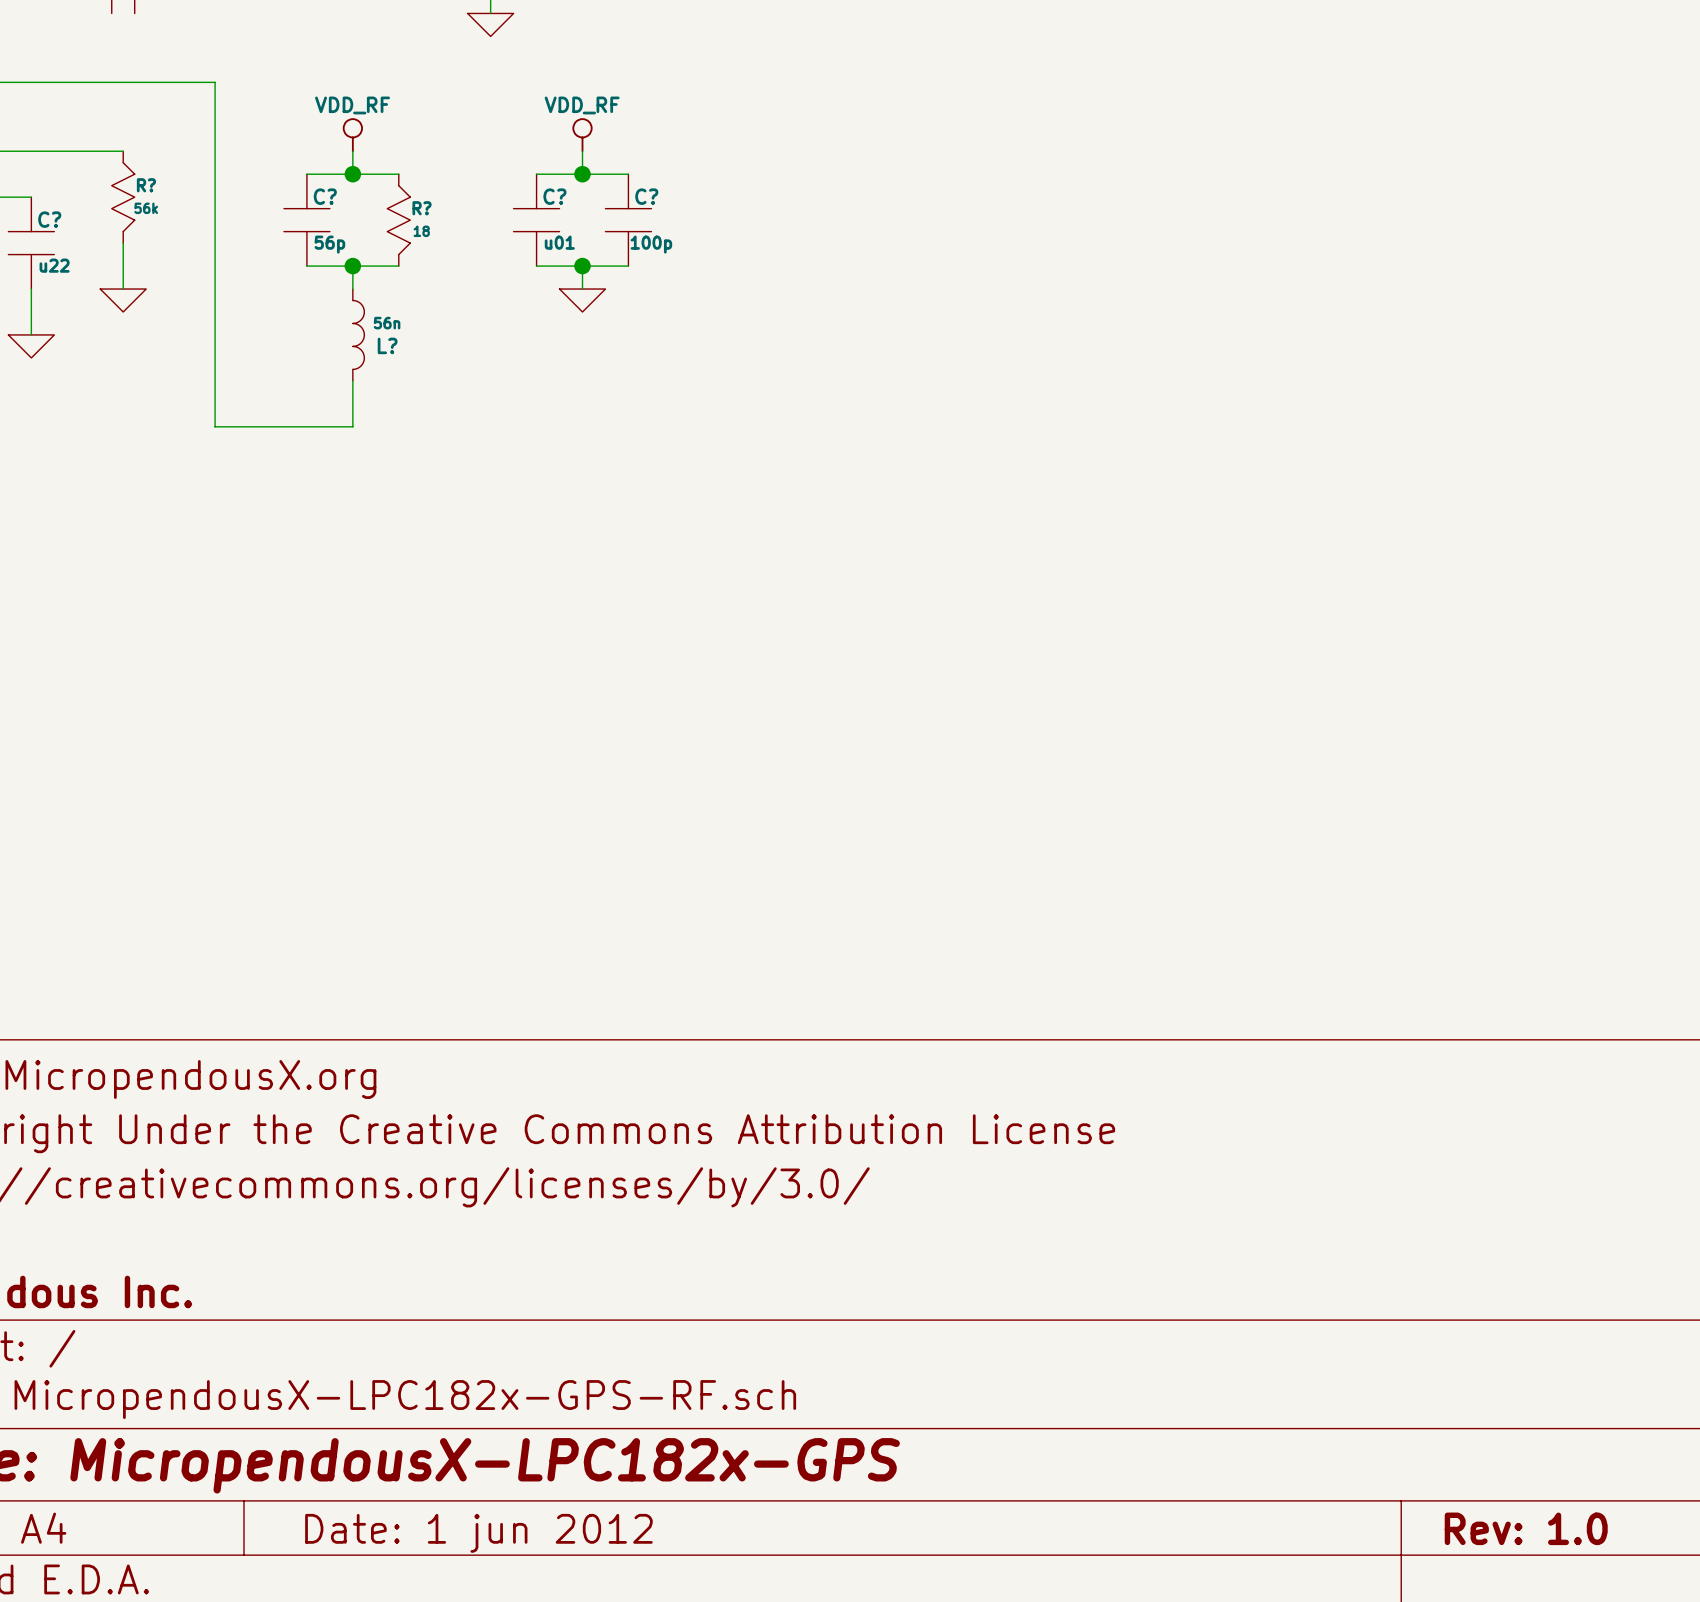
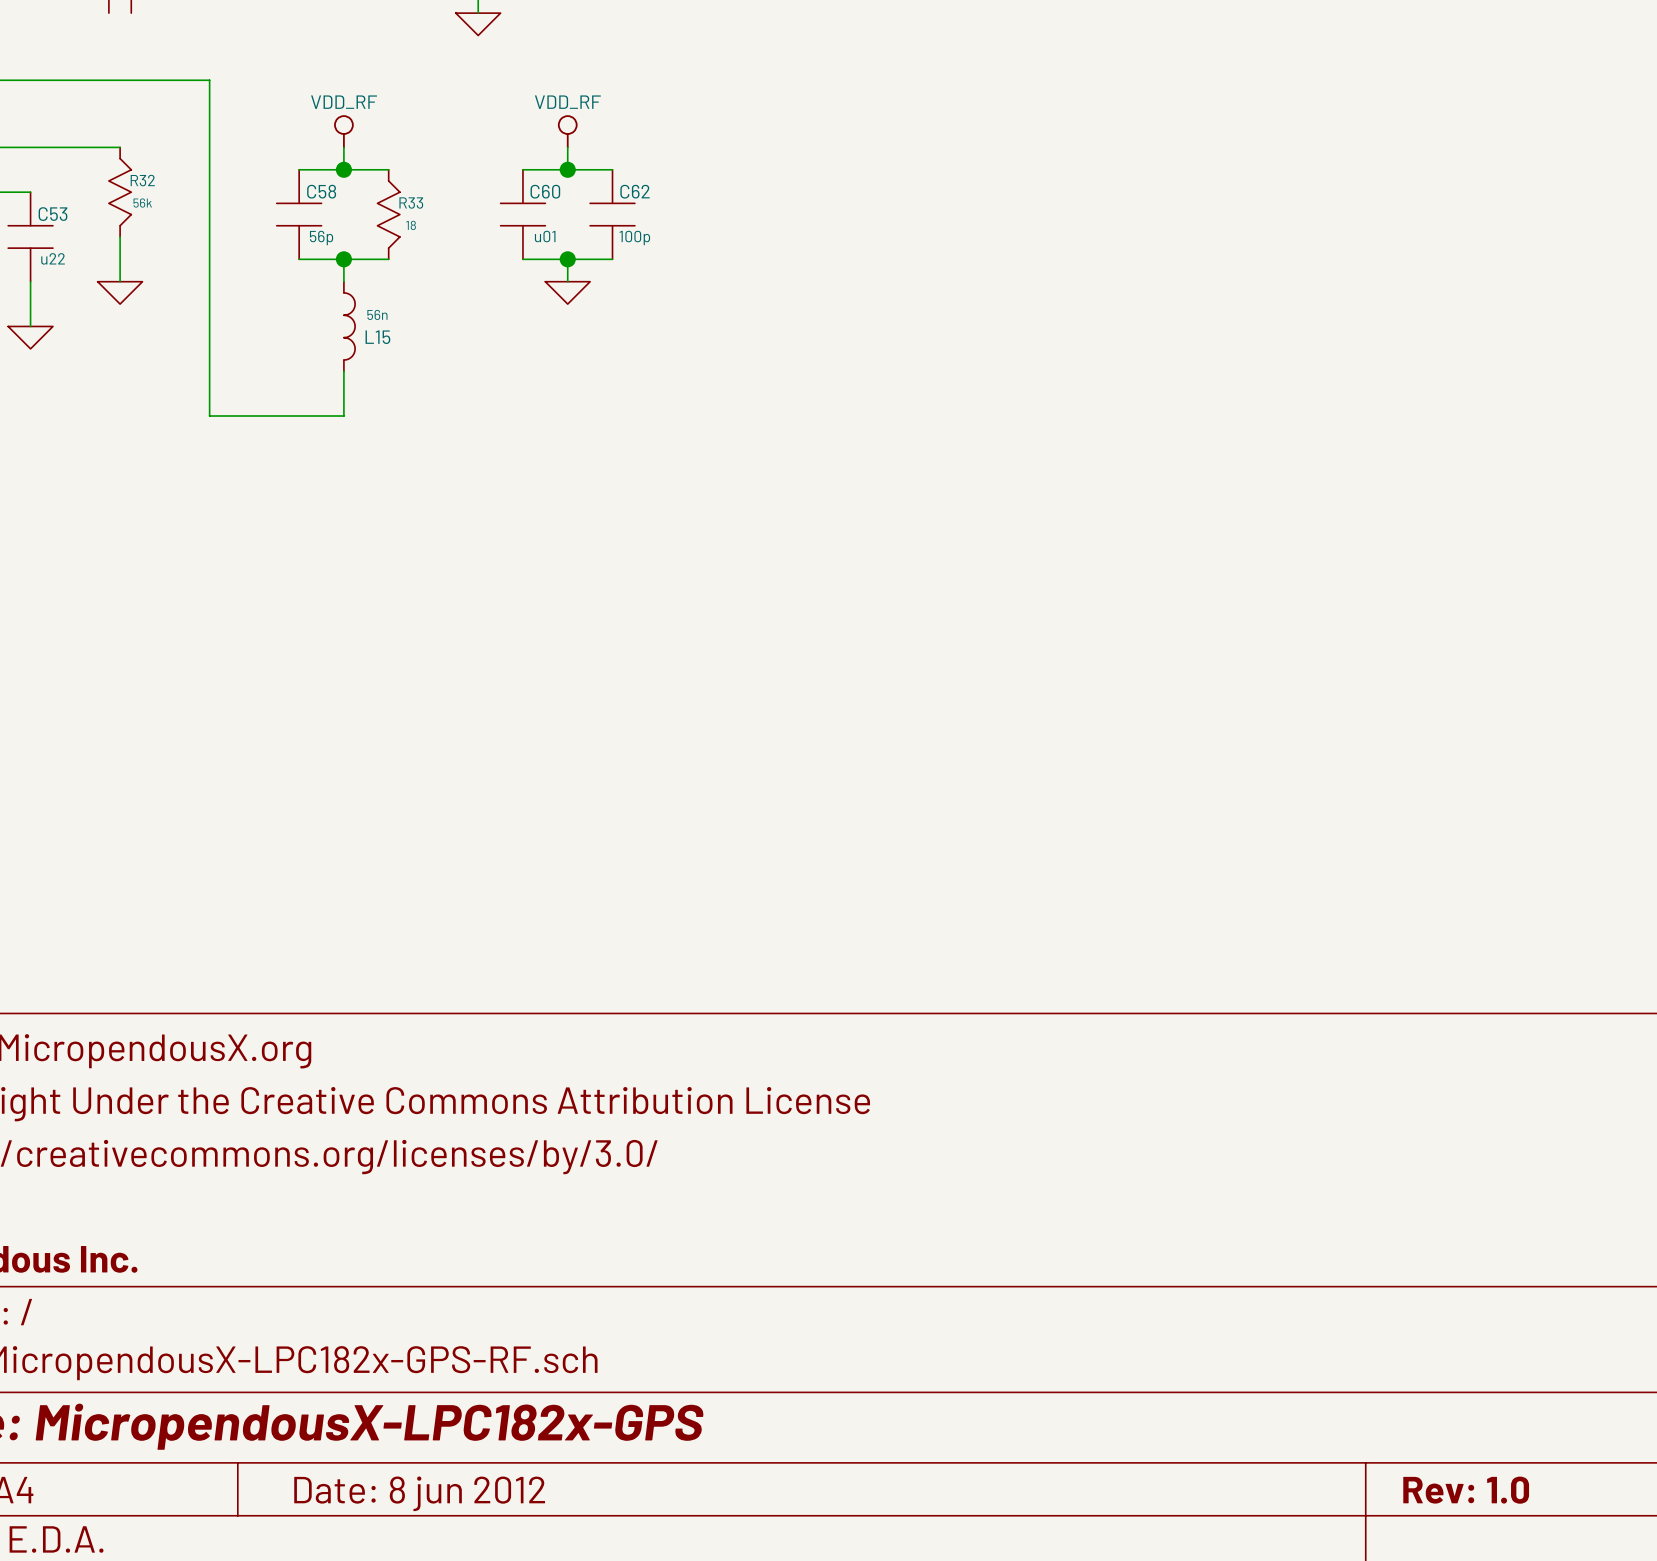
R? name: R? (146, 185) -> R32 (142, 180)
C? name: C? (325, 196) -> C58 (321, 191)
C? name: C? (554, 196) -> C60 (545, 191)
C? name: C? (646, 196) -> C62 (635, 191)
R? name: R? (422, 208) -> R33 (411, 203)
C? name: C? (49, 219) -> C53 (53, 214)
L? name: L? (387, 345) -> L15 (377, 337)
title block: Date: 1 jun 2012 (478, 1533) -> Date: 8 jun 2012 (419, 1493)

